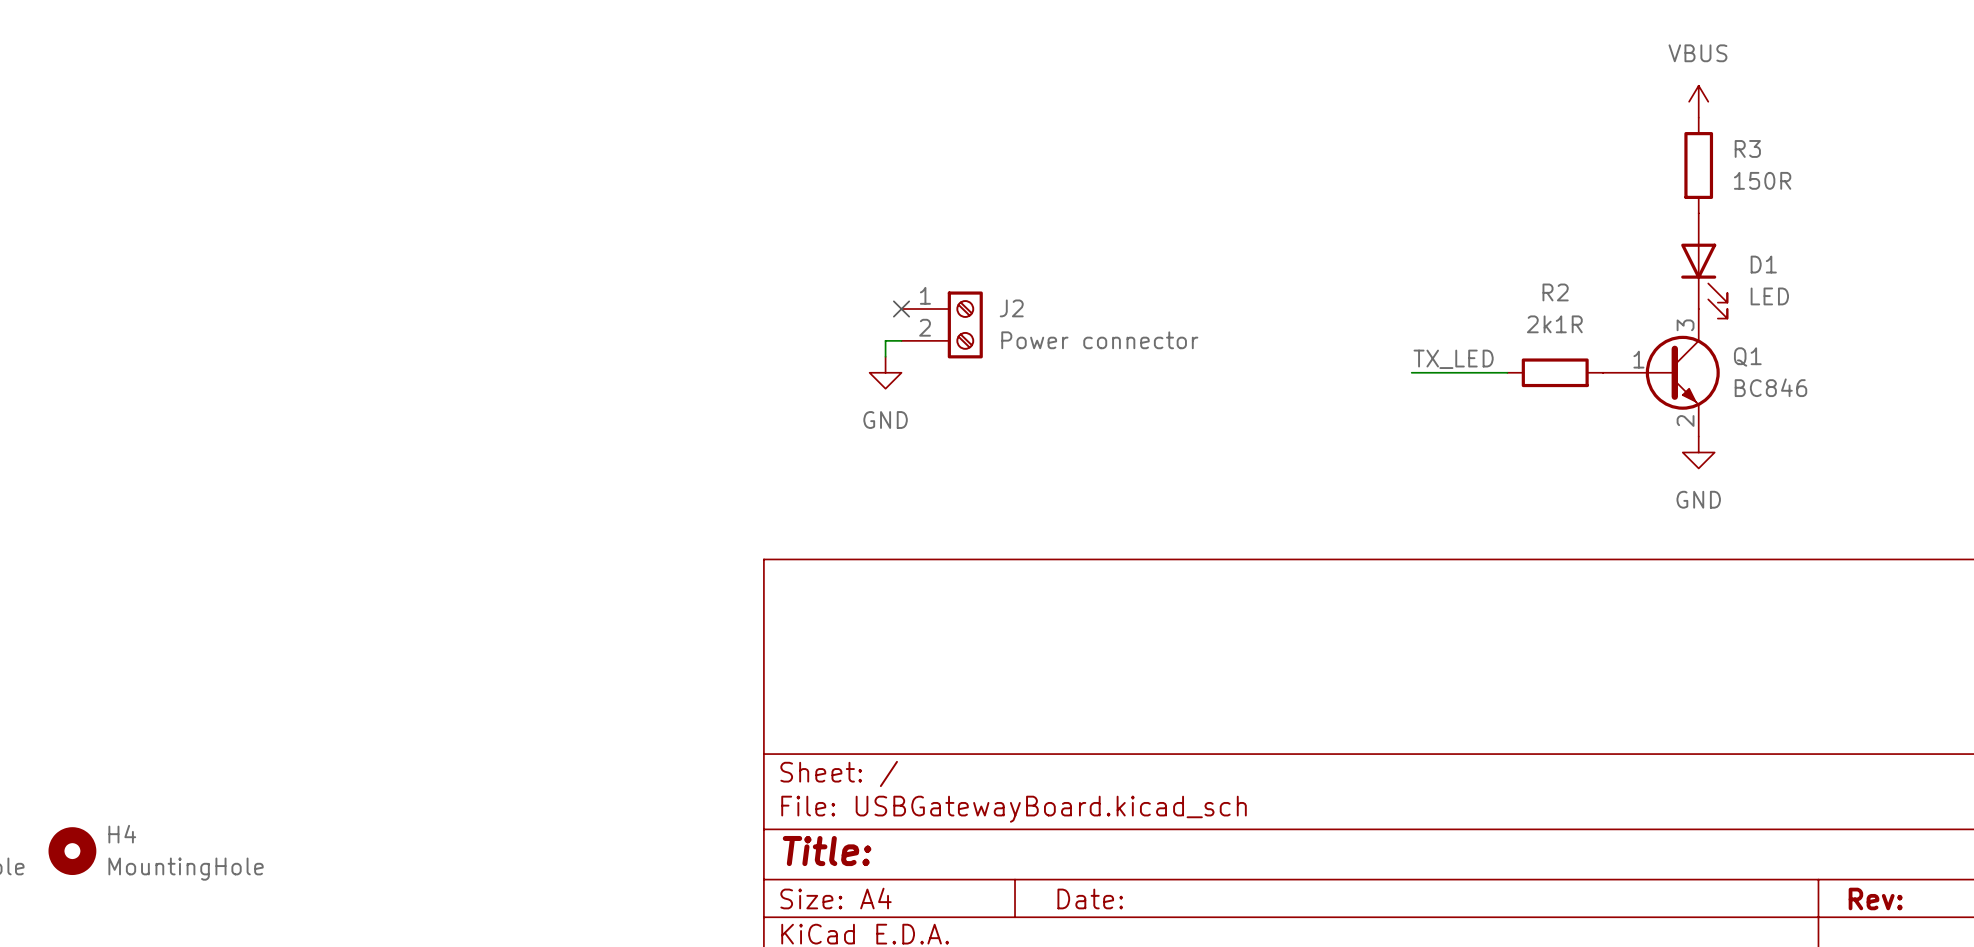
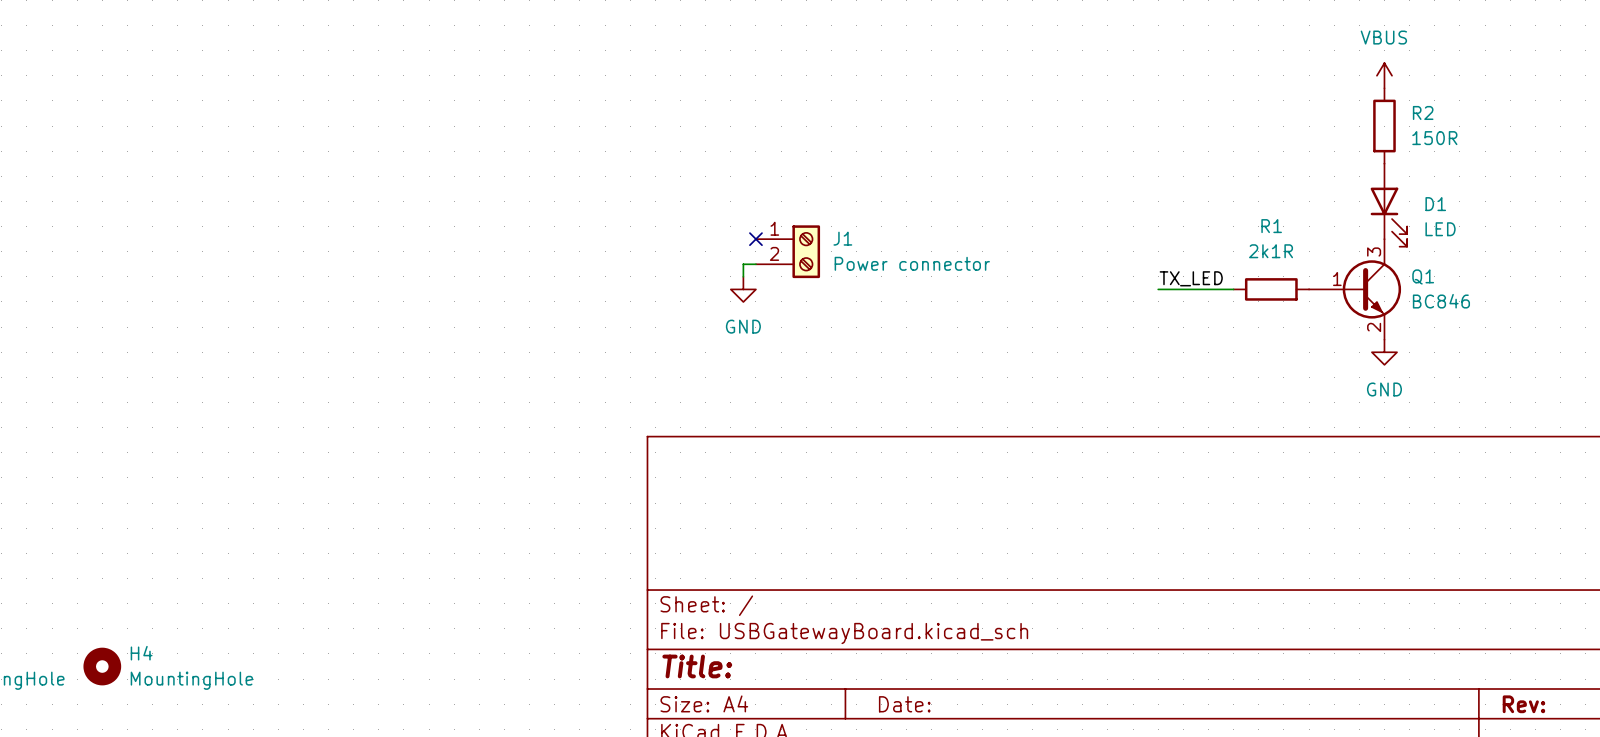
R3 name: R3 (1747, 148) -> R2 (1423, 112)
R2 name: R2 (1555, 292) -> R1 (1271, 226)
J2 name: J2 (1011, 308) -> J1 (842, 238)

